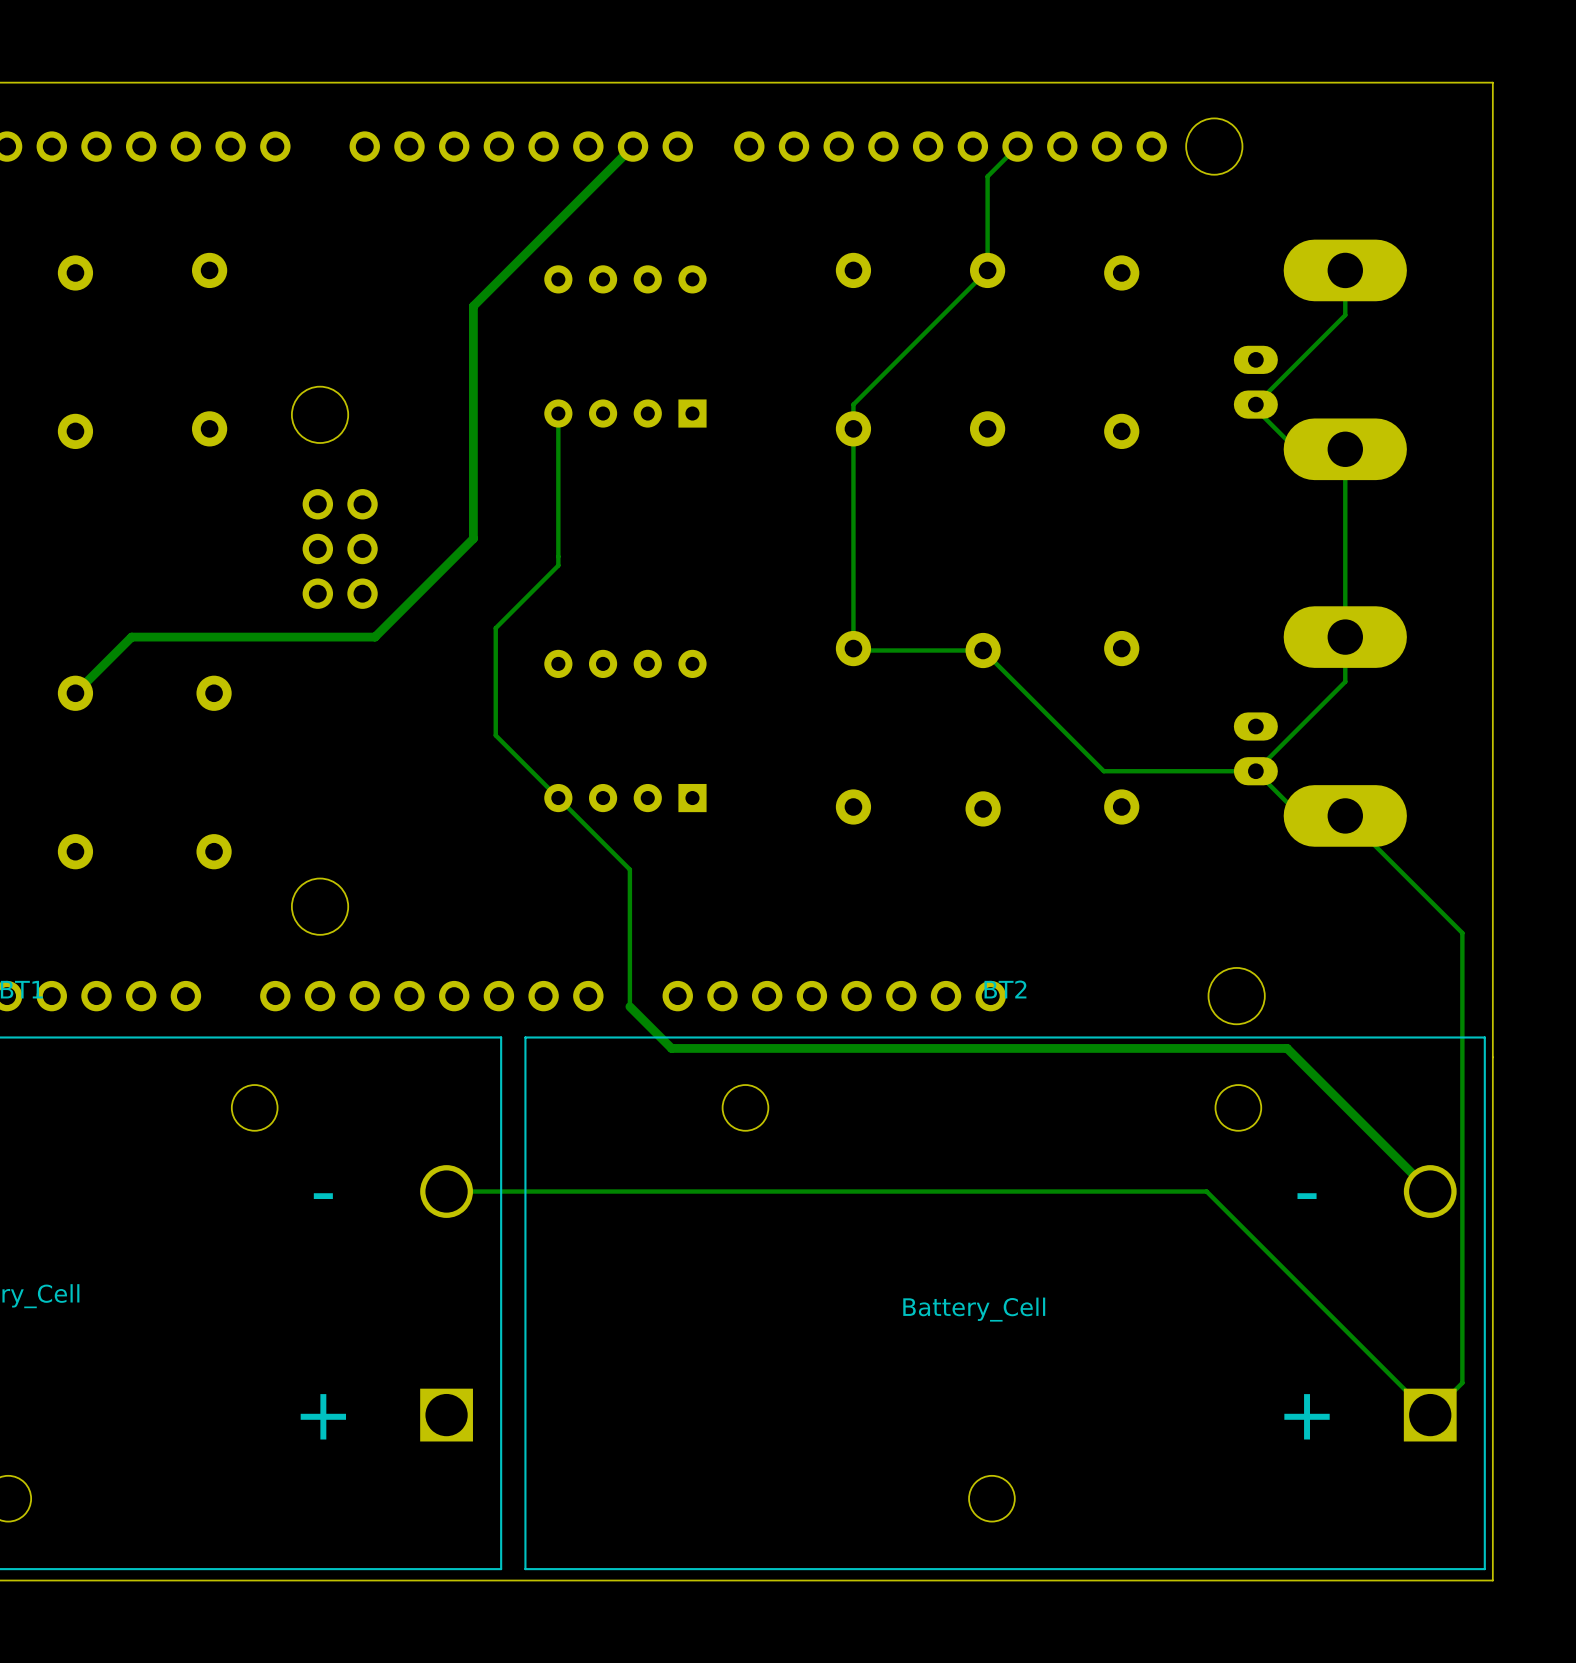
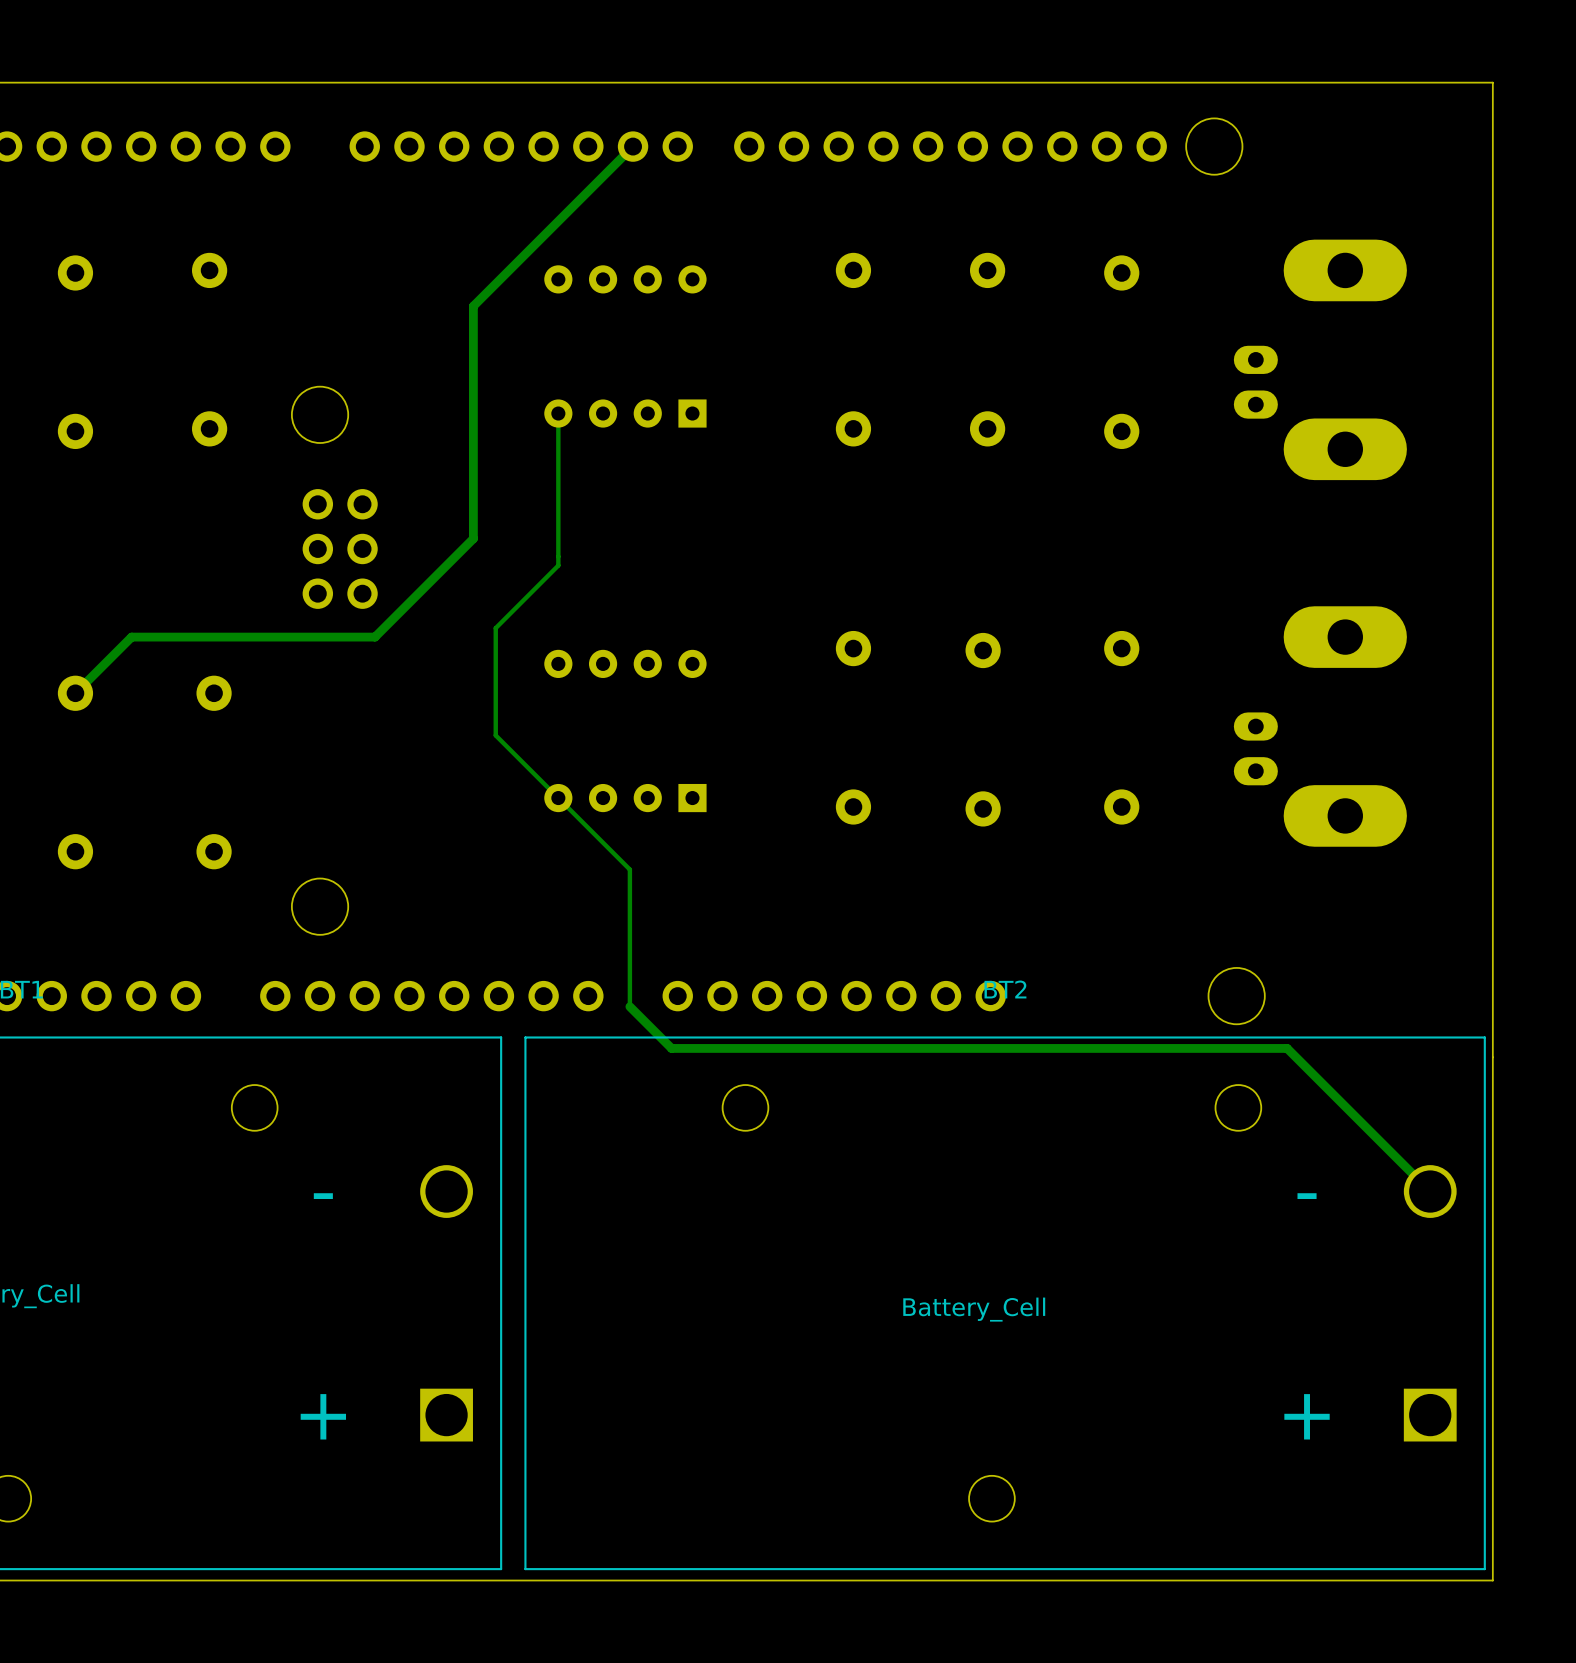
track: (1017, 146) (987, 176) (987, 270) (853, 404) (853, 648) (855, 650) (983, 650) (1103, 771) (1255, 771) -> none
track: (1345, 270) (1345, 315) (1255, 404) (1255, 409) (1296, 449) (1345, 449) (1345, 681) (1255, 771) -> none
track: (1255, 771) (1300, 815) (1345, 815) (1462, 933) (1462, 1382) (1430, 1415) (1206, 1191) (446, 1191) -> none

